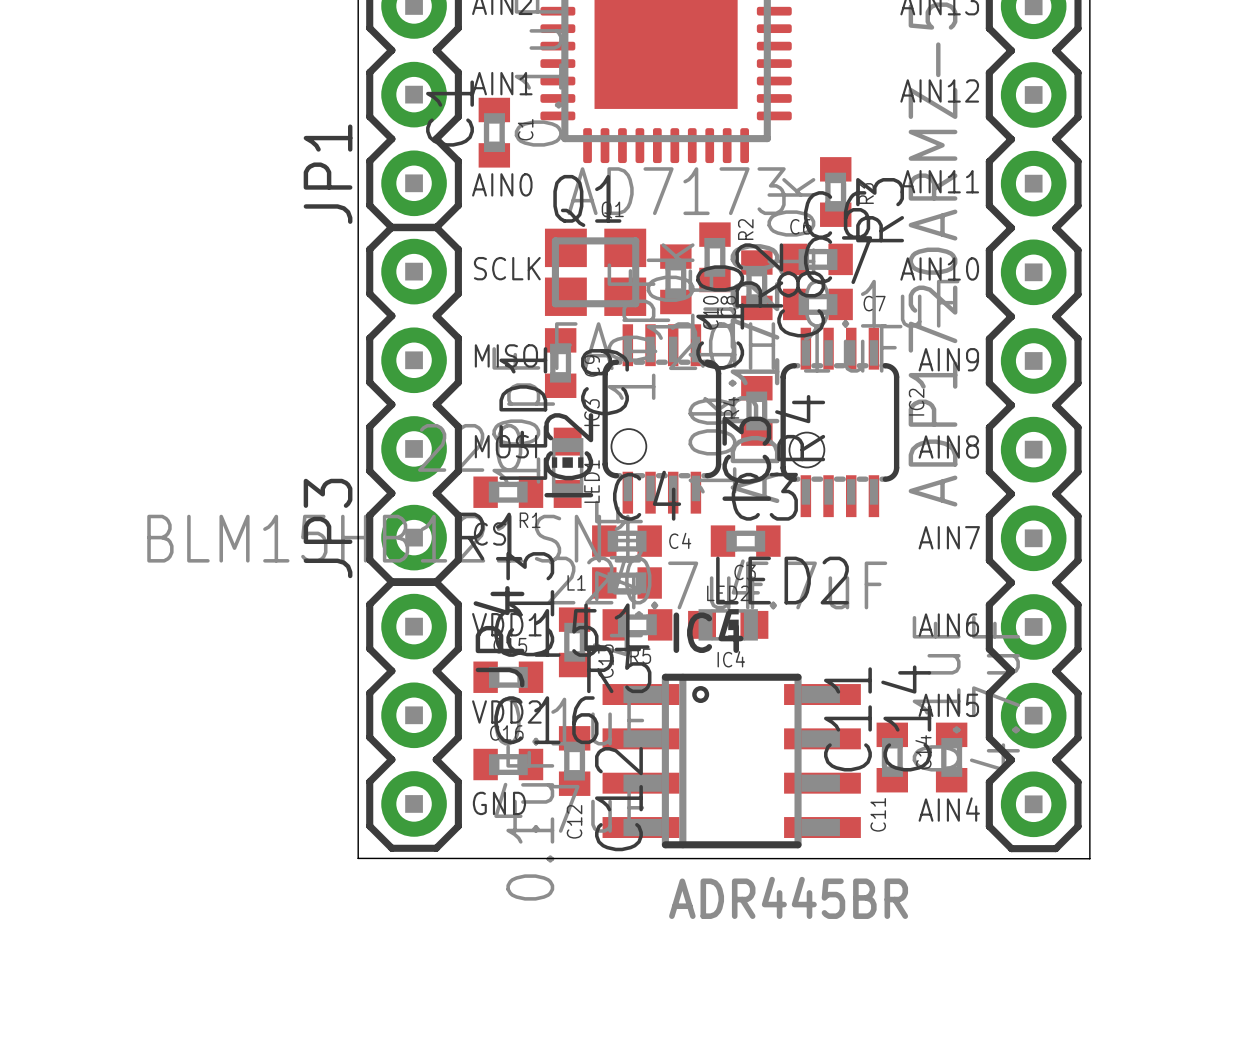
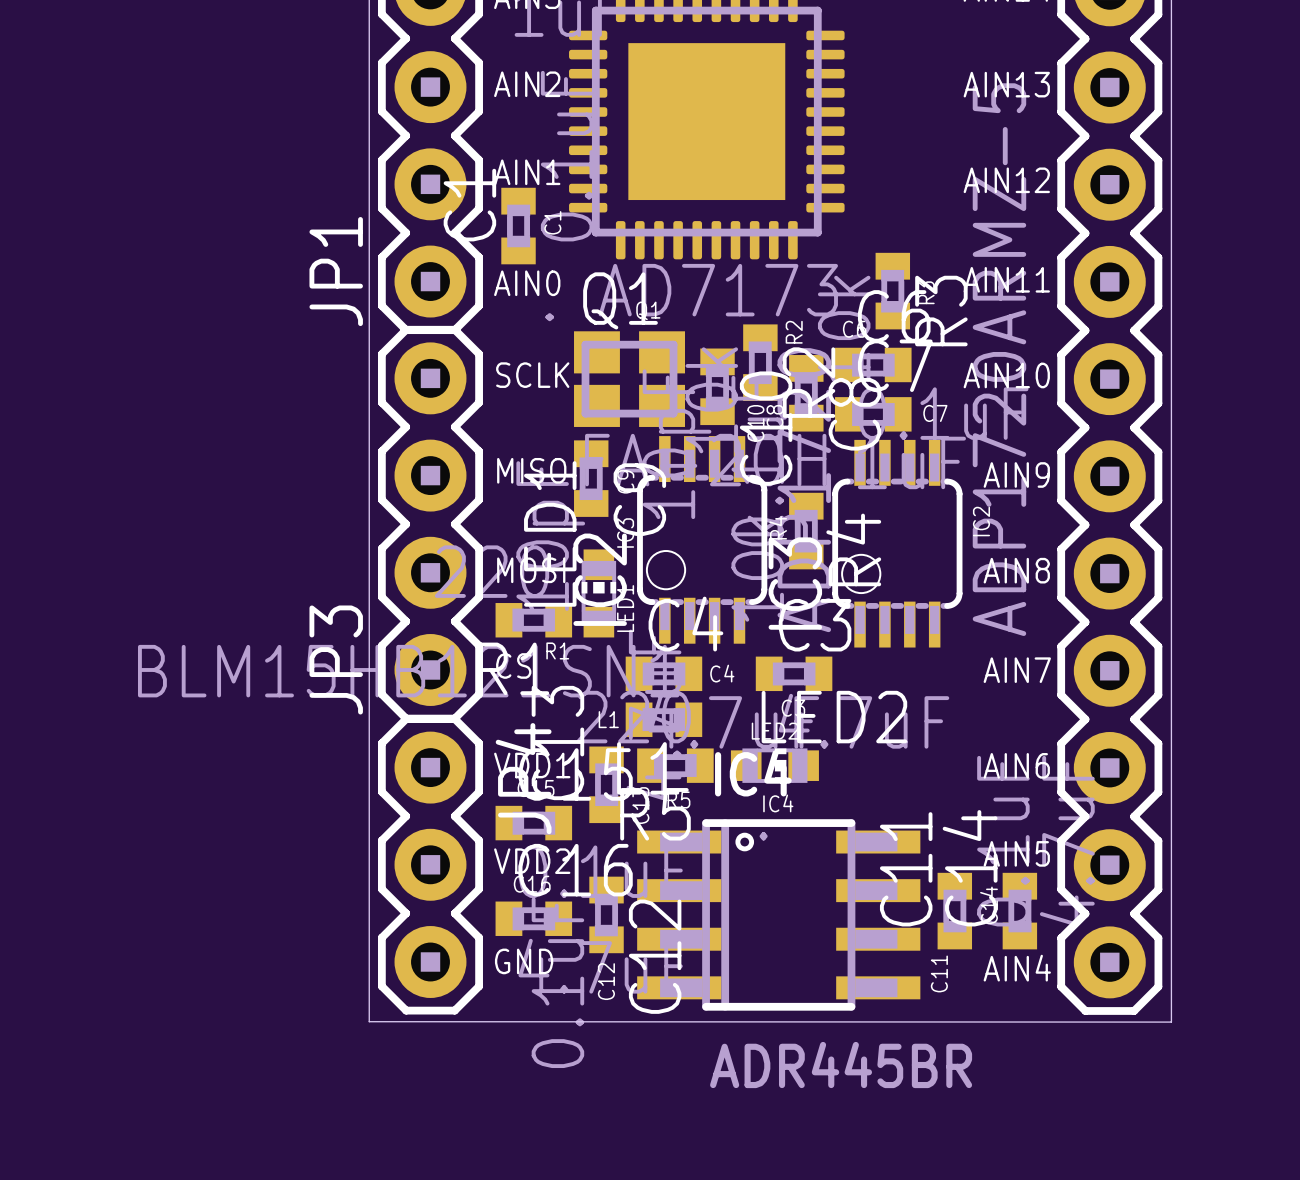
JP1 value: none -> . (549, 317)
LED2 value: none -> . (763, 836)

